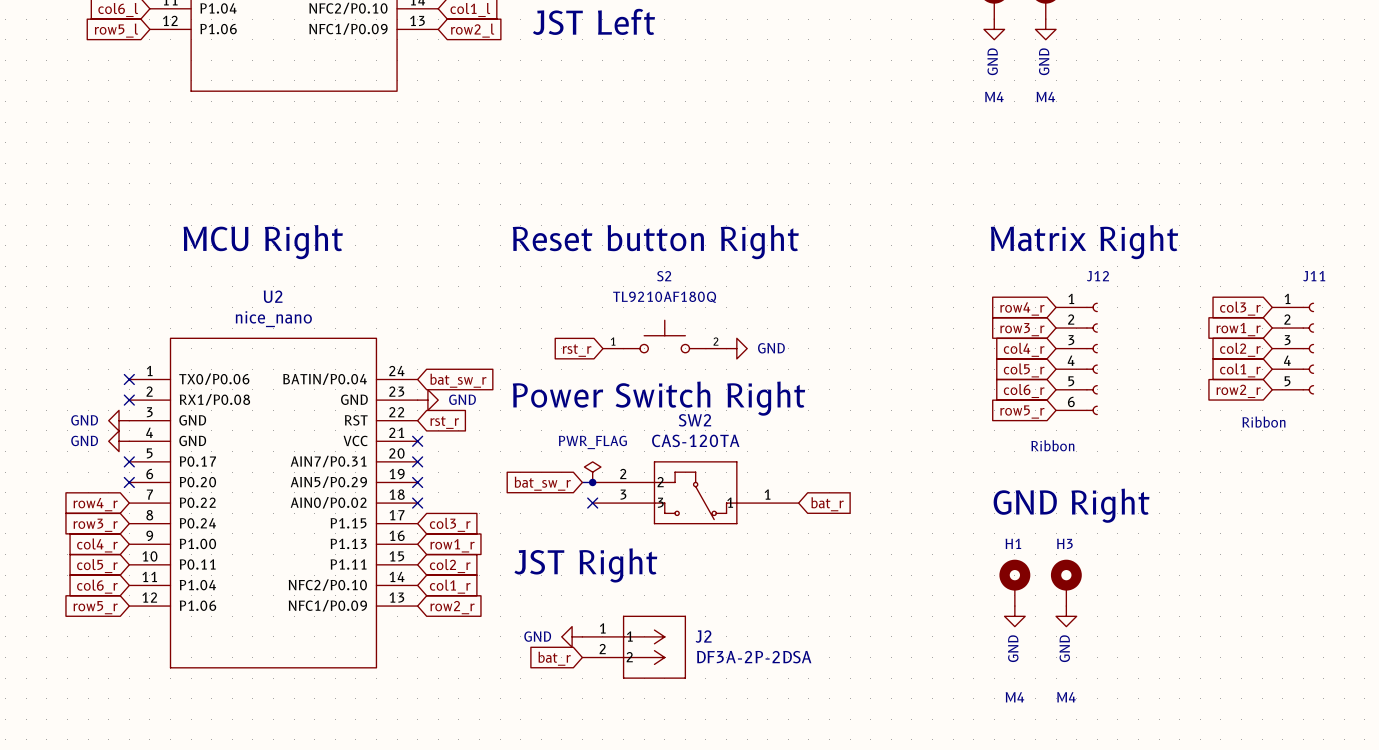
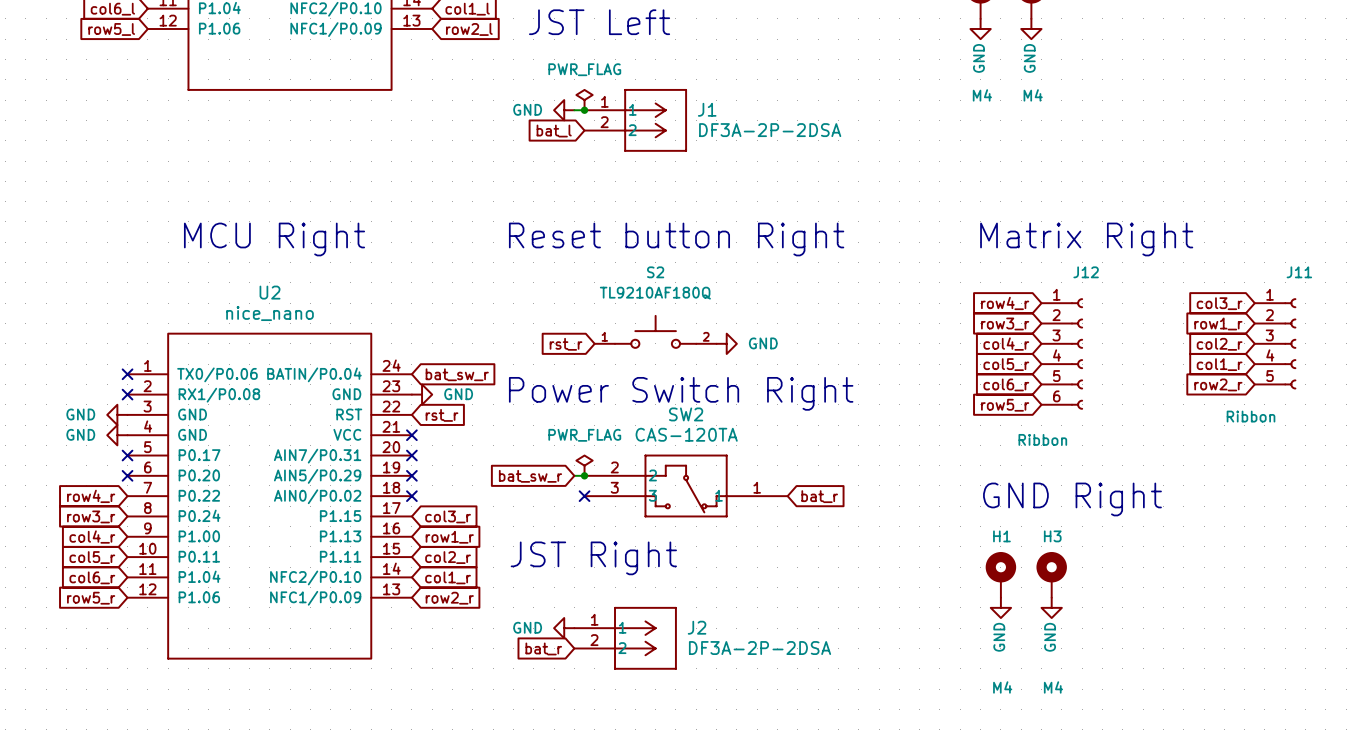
power symbol: none -> PWR_FLAG (584, 100)
power symbol: none -> GND (564, 110)
wire: none -> (574, 110) (584, 110)
junction: none -> (584, 110)
J1: none -> DF3A-2P-2DSA (635, 120)
global label: none -> bat_l (554, 131)

